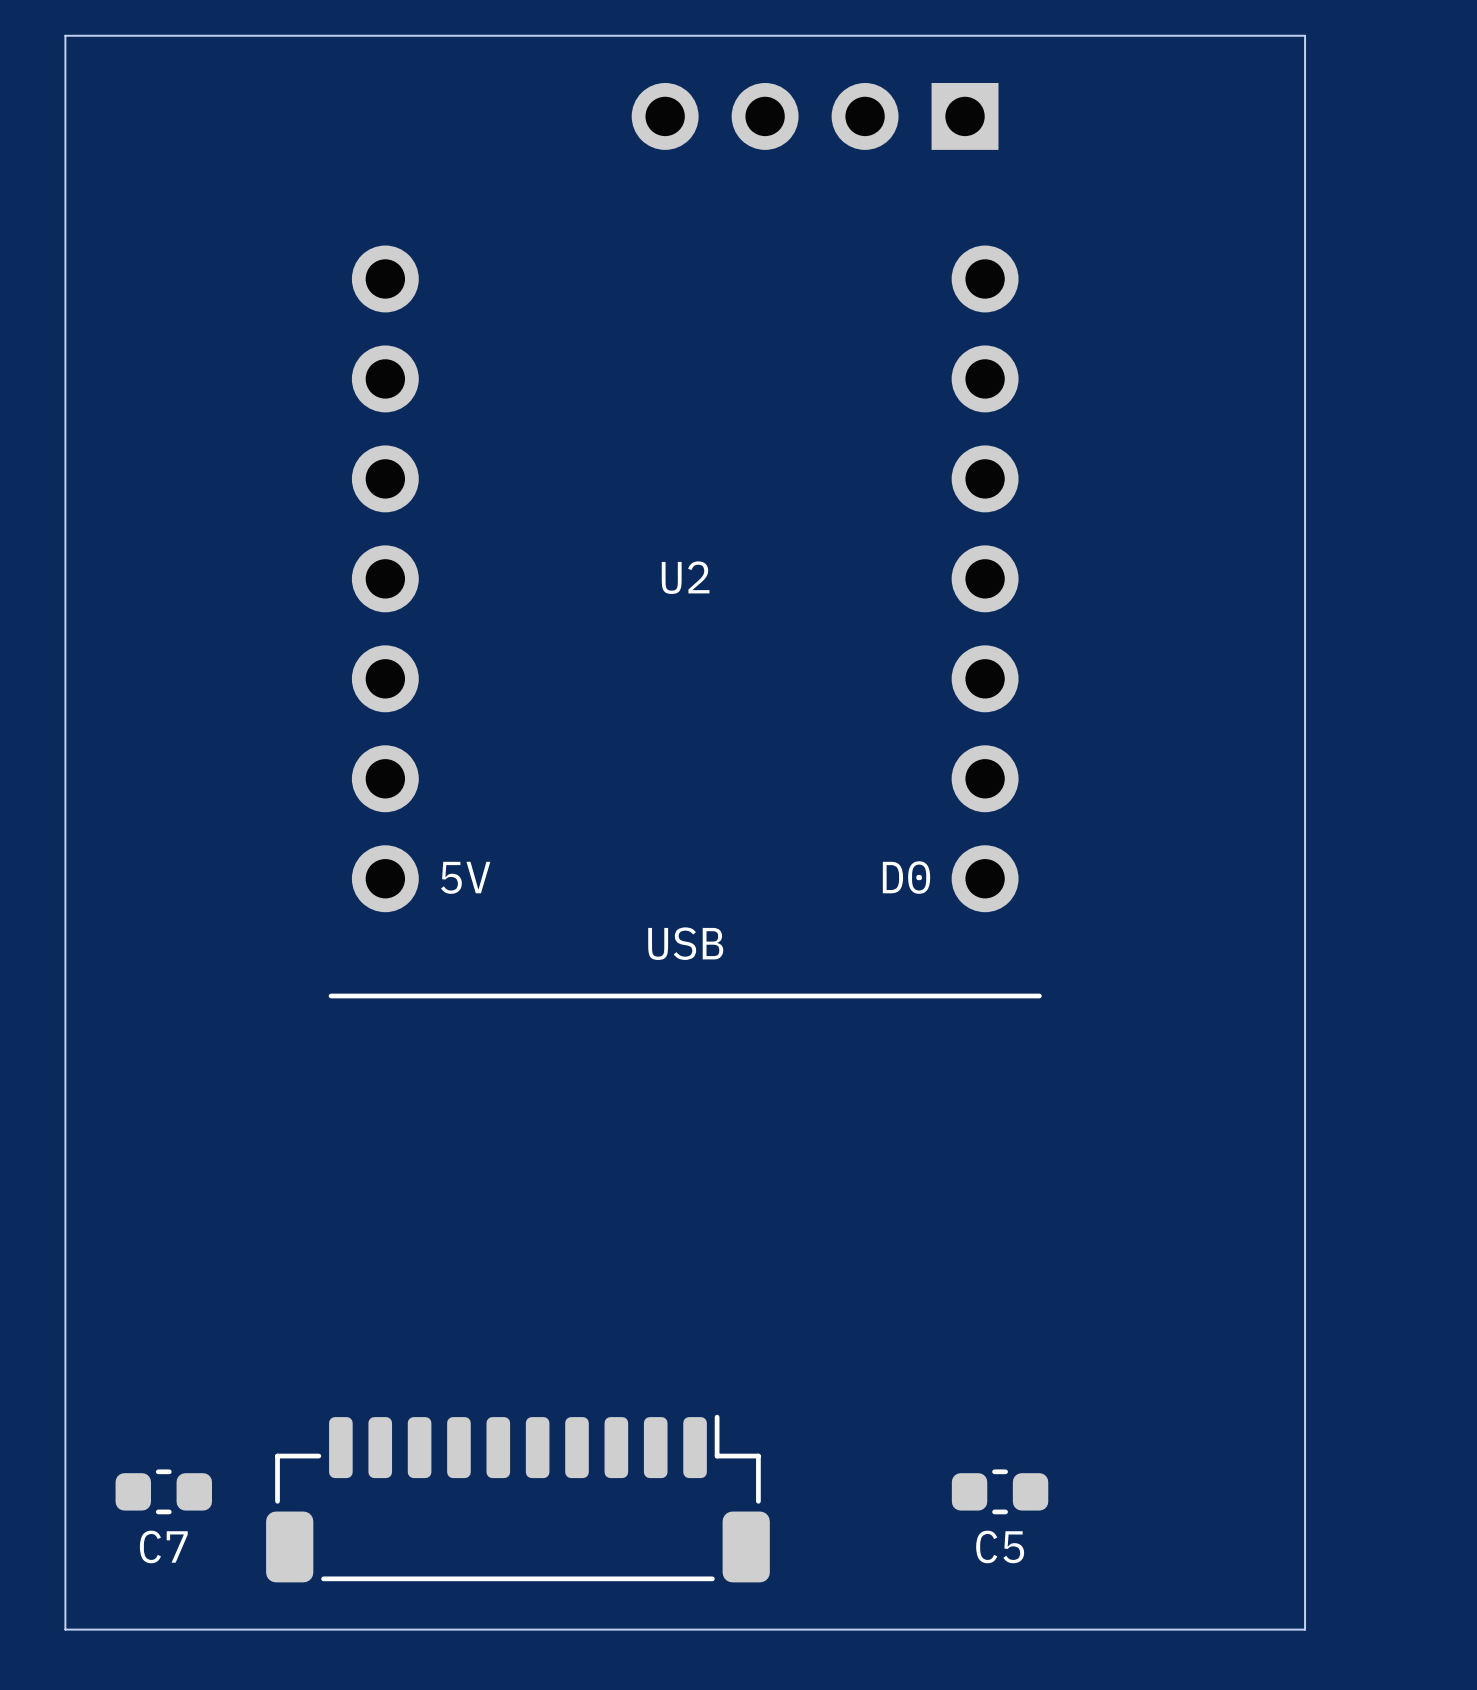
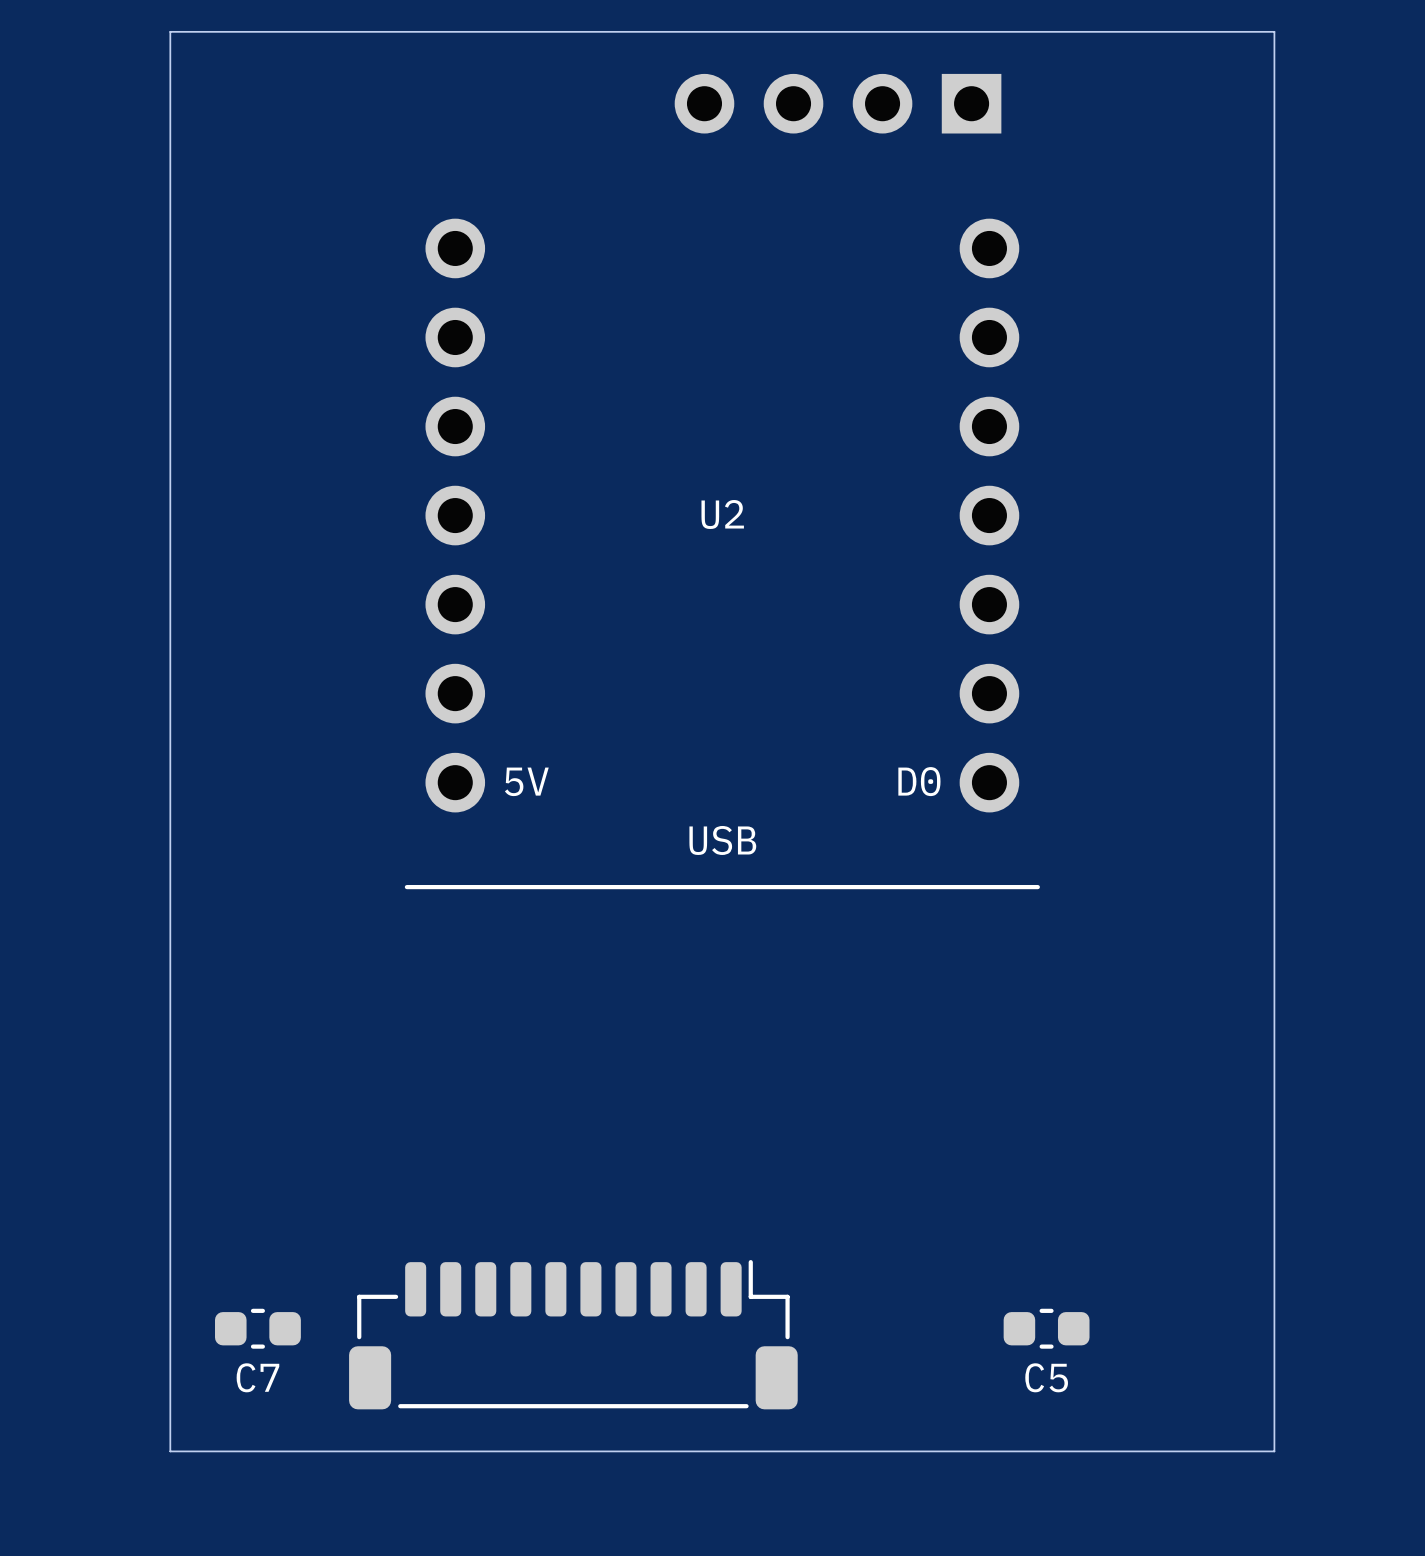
C5 position: (1000, 1491) -> (1046, 1328)

